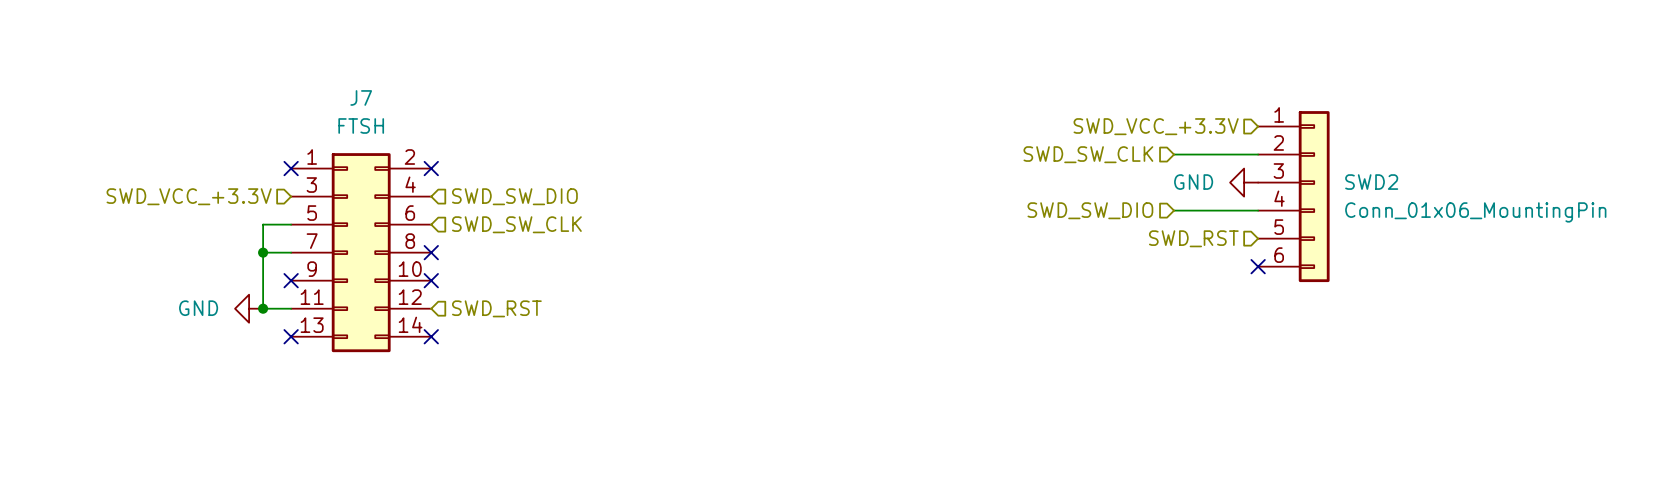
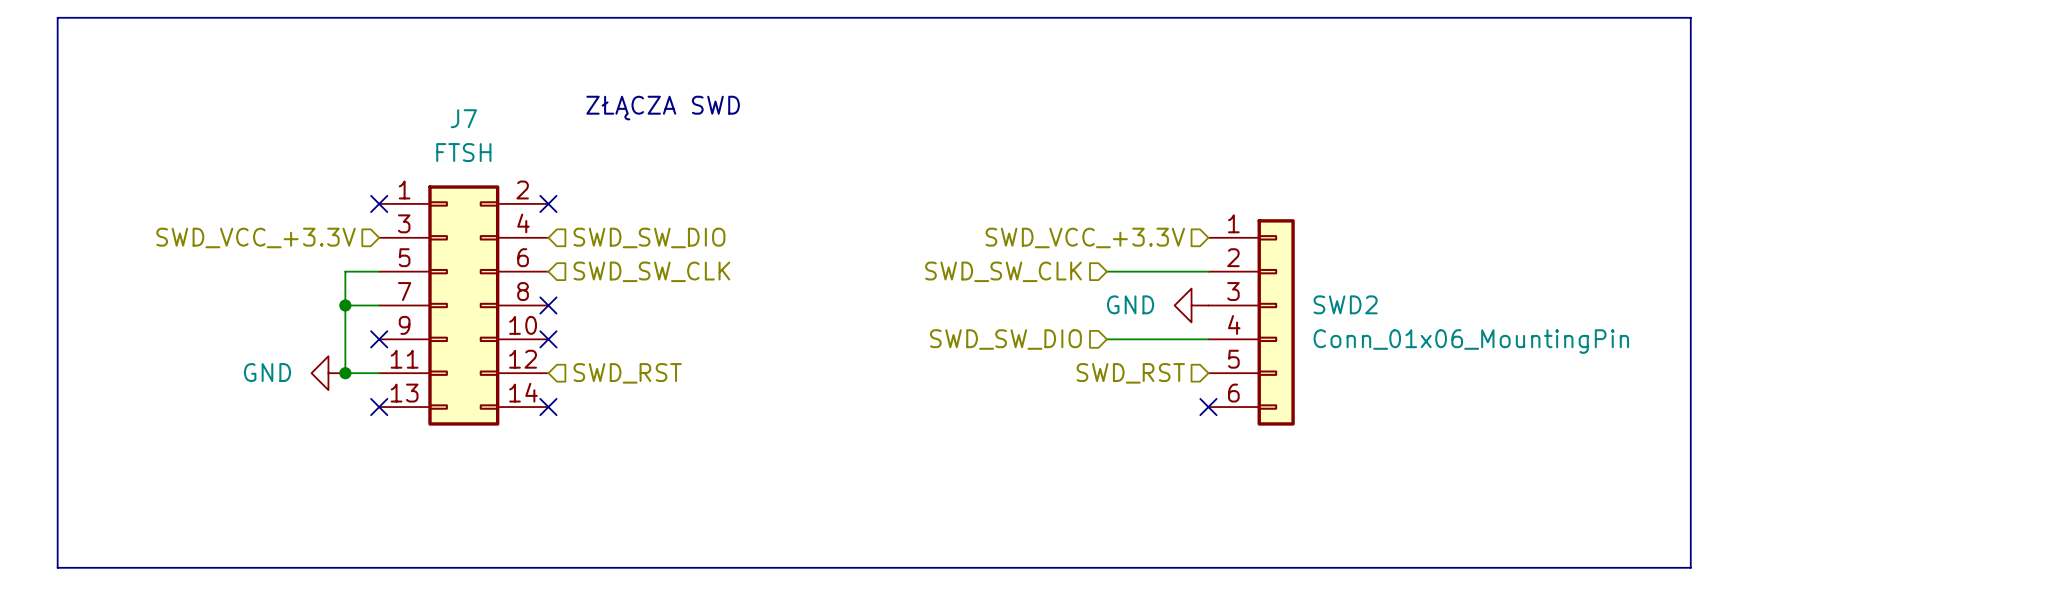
line: none -> (57, 17) (1690, 17) (1690, 567) (57, 567) (57, 17)
text: none -> ZŁĄCZA SWD (663, 108)
hierarchical label: SWD_VCC_+3.3V (1156, 126) -> none
hierarchical label: SWD_SW_CLK (1088, 154) -> none
wire: (1174, 154) (1258, 154) -> none
power symbol: GND (1244, 182) -> none
hierarchical label: none -> SWD_VCC_+3.3V (1085, 237)
SWD2 position: (1293, 196) -> (1251, 322)
hierarchical label: SWD_SW_DIO (1090, 210) -> none
wire: (1174, 210) (1258, 210) -> none
hierarchical label: none -> SWD_SW_CLK (1003, 271)
wire: none -> (1106, 271) (1208, 271)
hierarchical label: SWD_RST (1193, 238) -> none
power symbol: none -> GND (1191, 305)
no-connect mark: (1258, 266) -> none
hierarchical label: none -> SWD_SW_DIO (1005, 339)
wire: none -> (1106, 339) (1208, 339)
hierarchical label: none -> SWD_RST (1130, 373)
no-connect mark: none -> (1208, 407)

